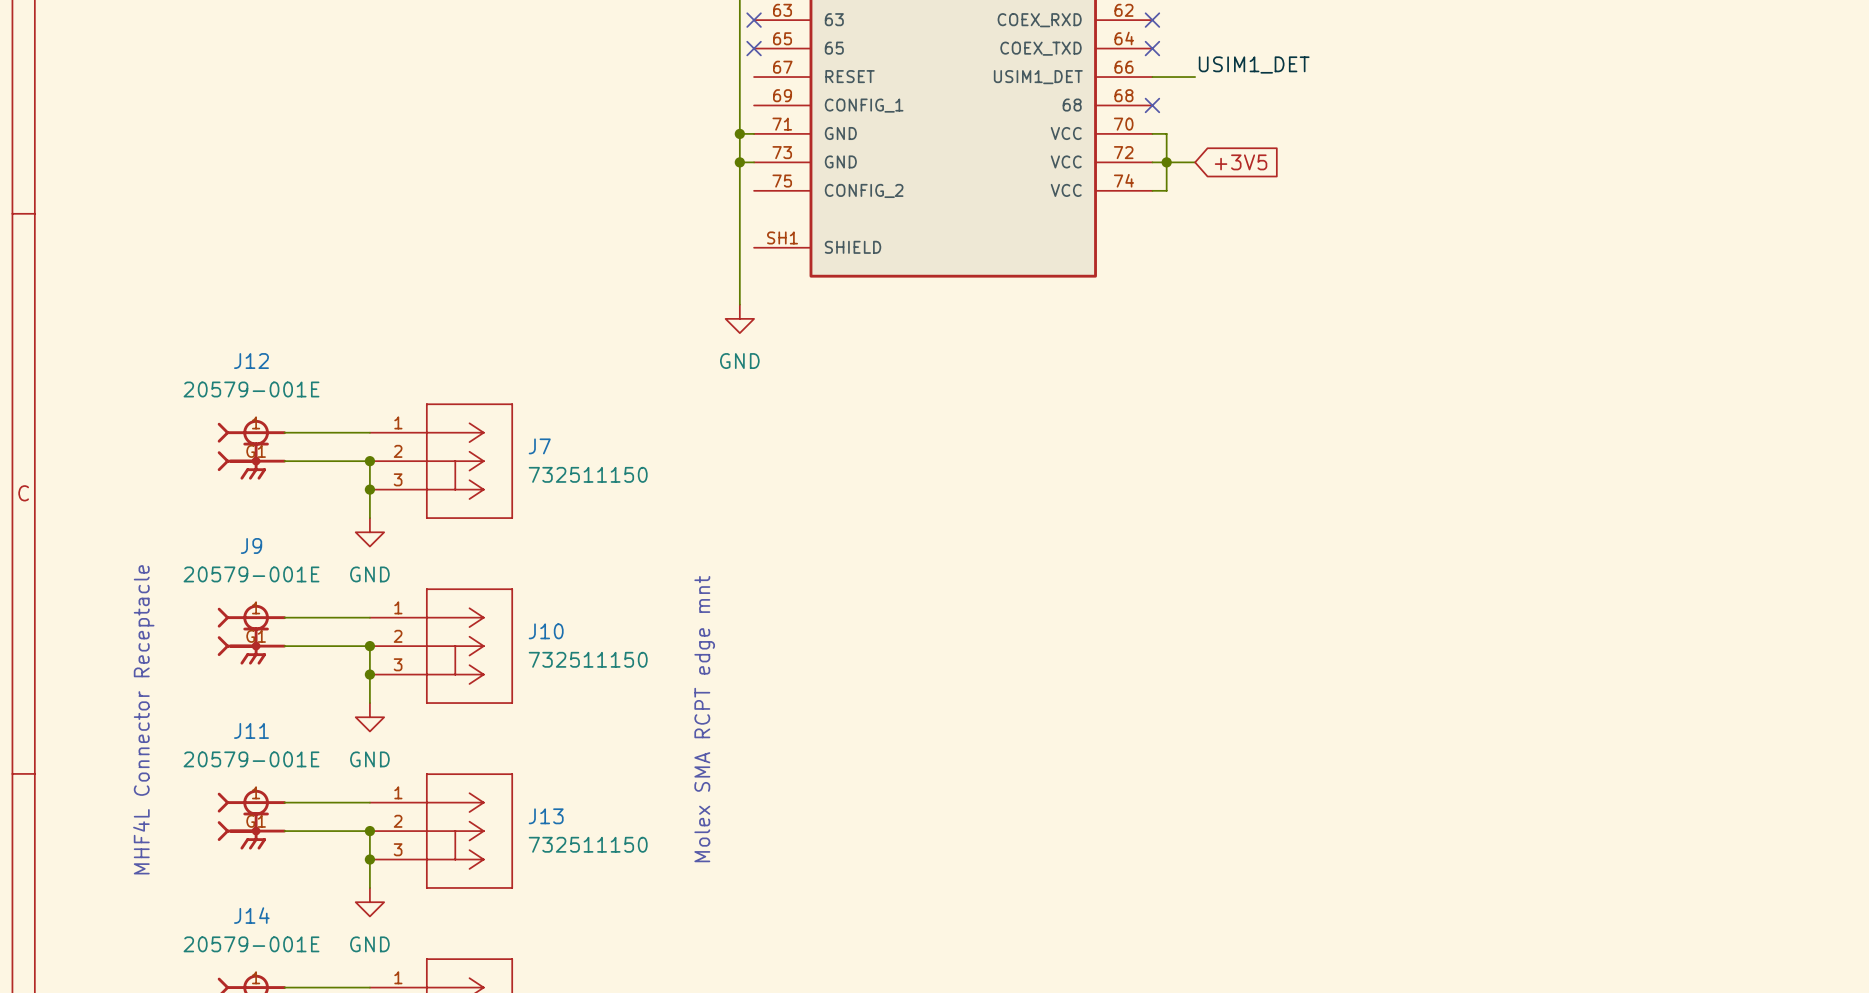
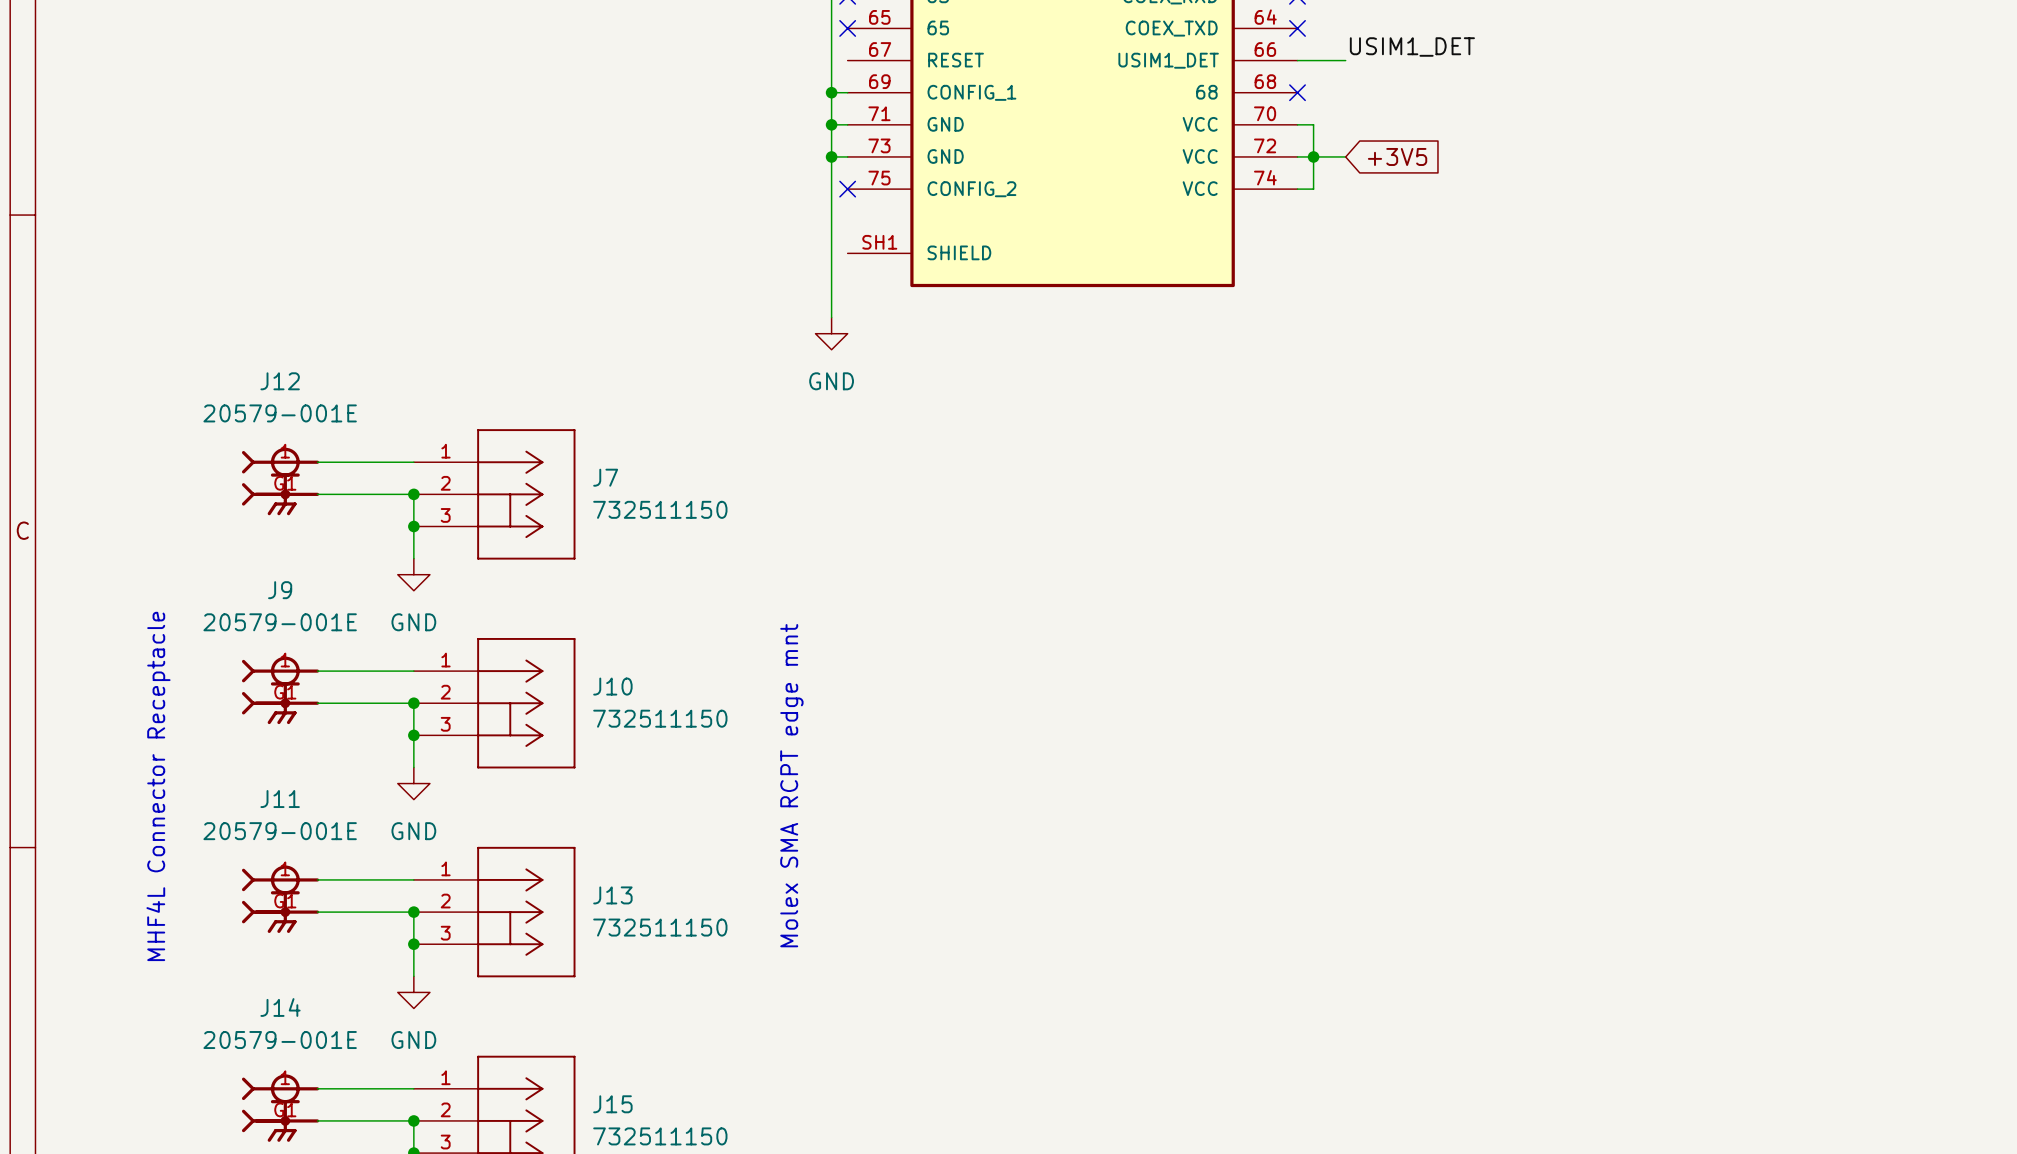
wire: none -> (831, 92) (847, 92)
junction: none -> (831, 92)
no-connect mark: none -> (847, 189)

